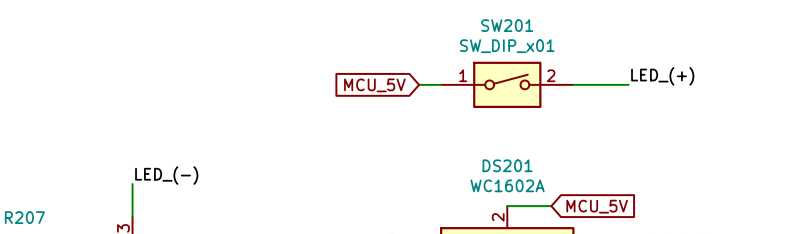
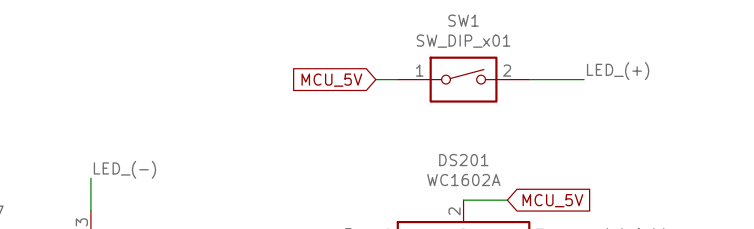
SW201 name: SW201 (507, 25) -> SW1 (463, 20)

